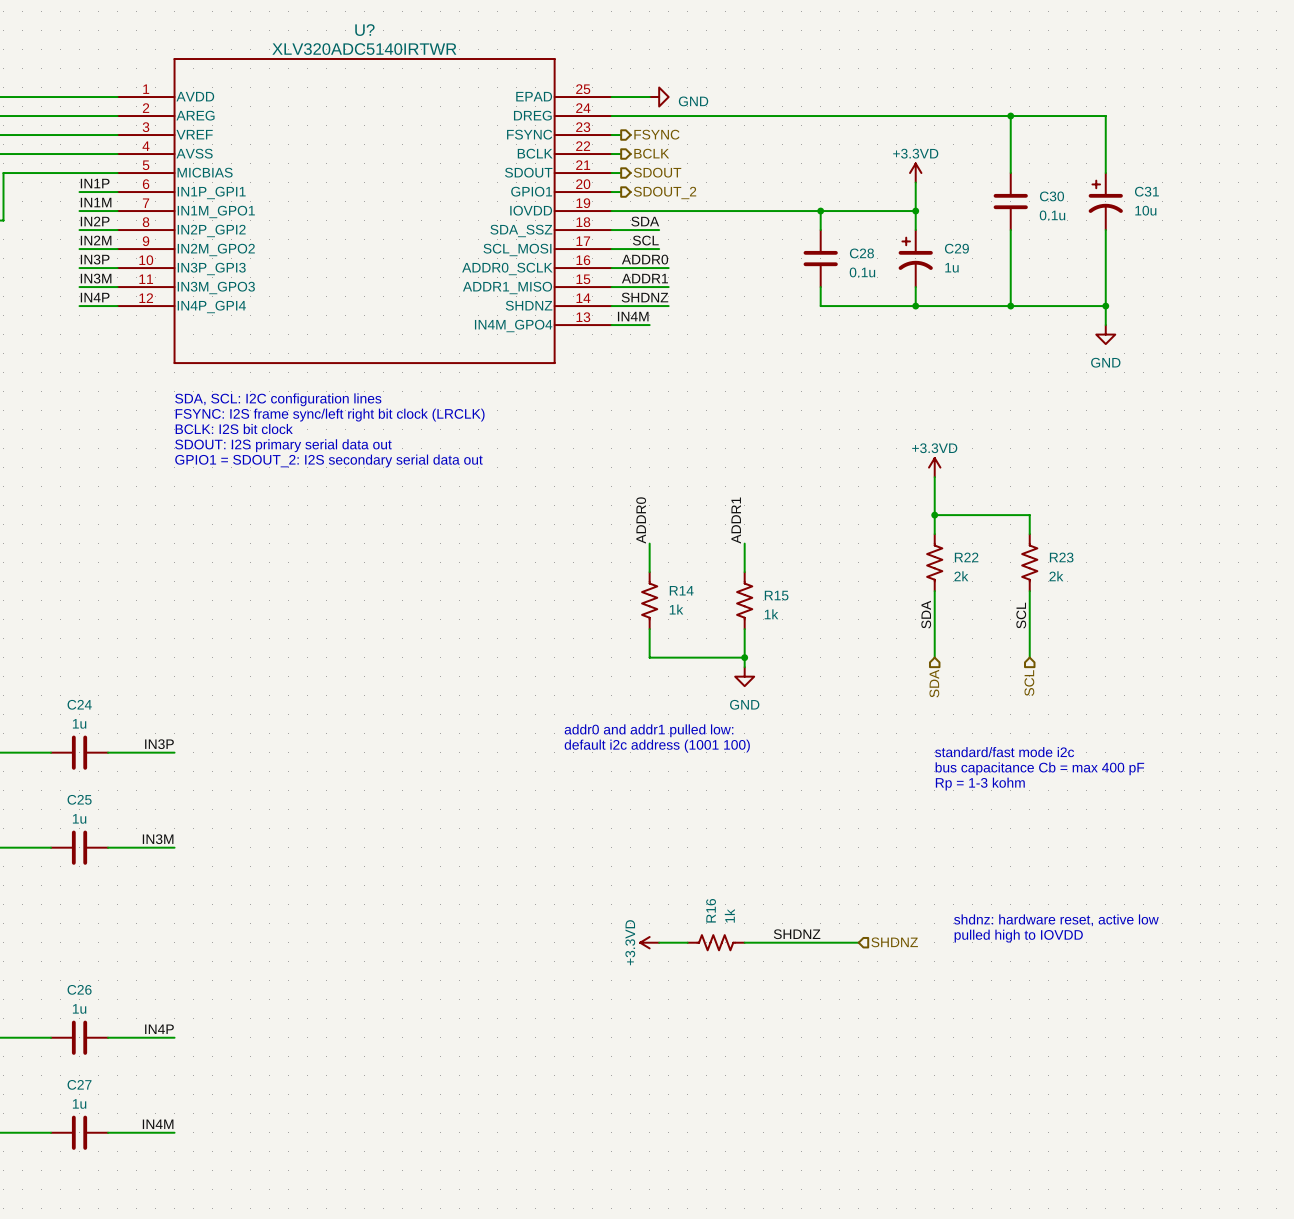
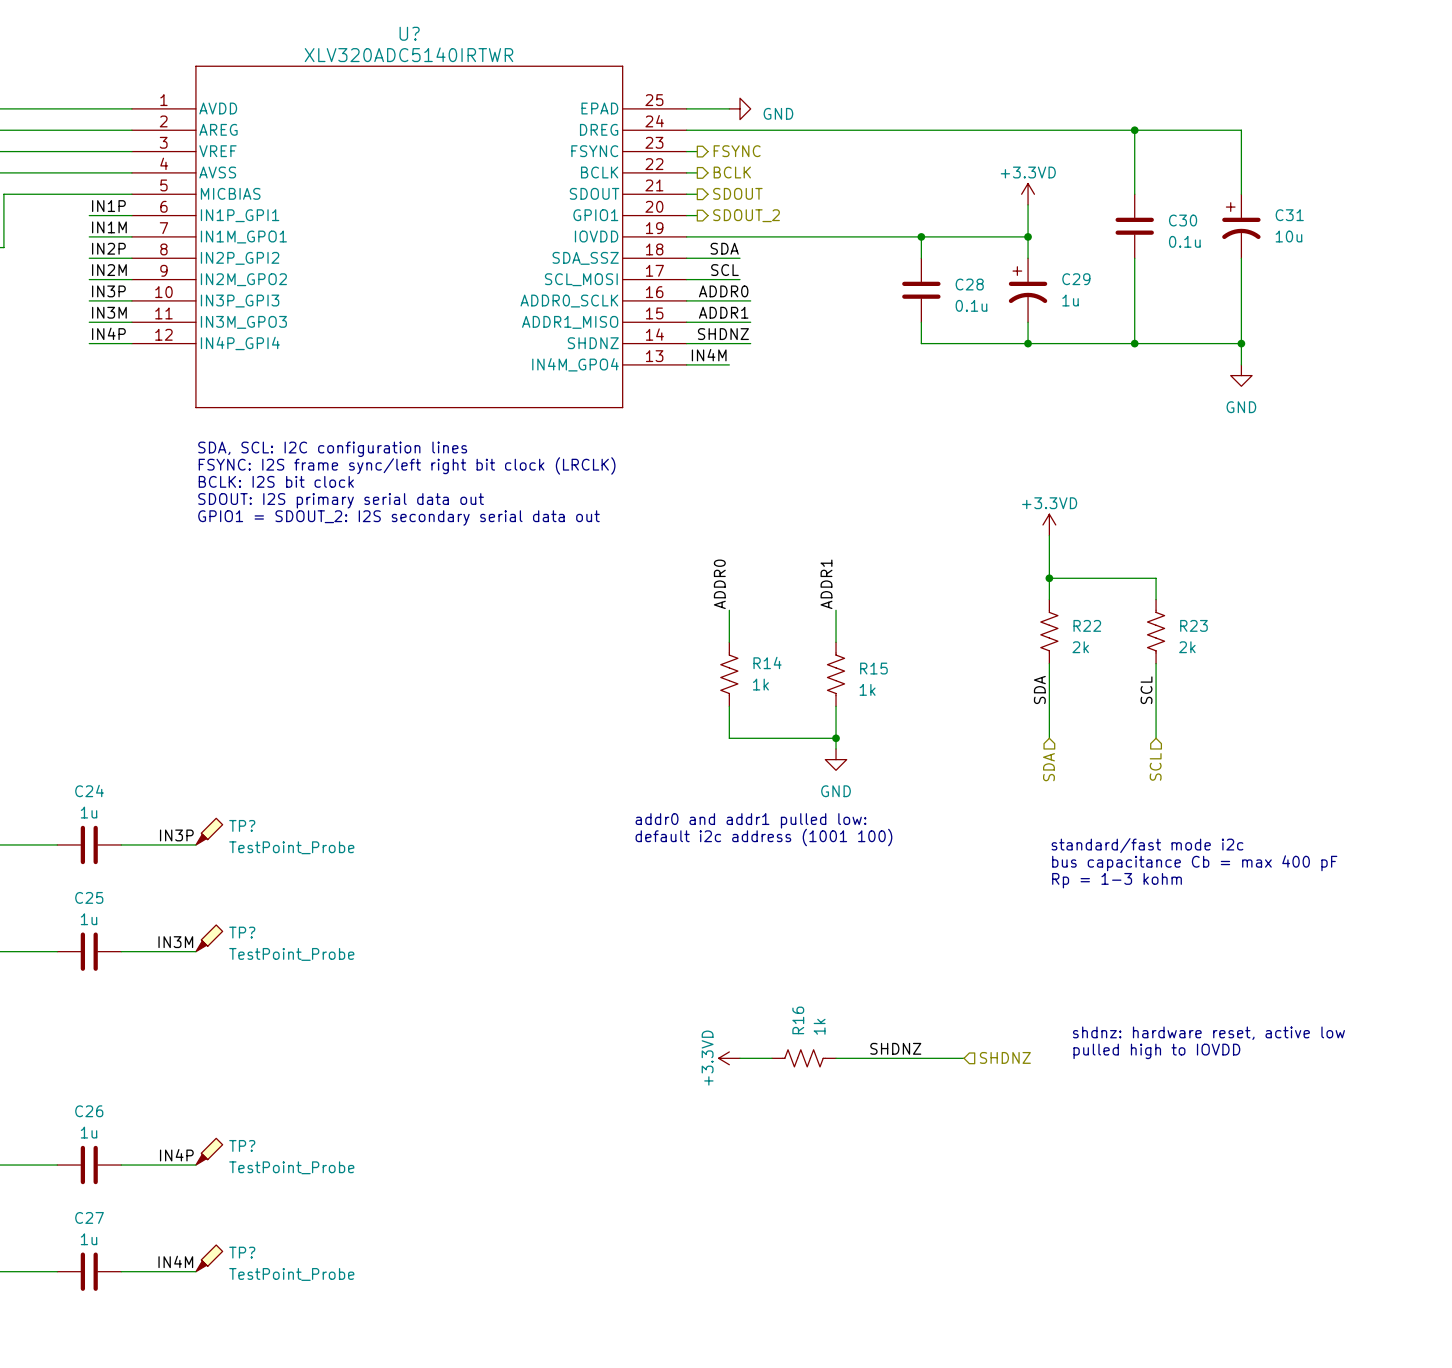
TP?: none -> TestPoint_Probe (209, 831)
TP?: none -> TestPoint_Probe (209, 938)
TP?: none -> TestPoint_Probe (209, 1151)
TP?: none -> TestPoint_Probe (209, 1258)

